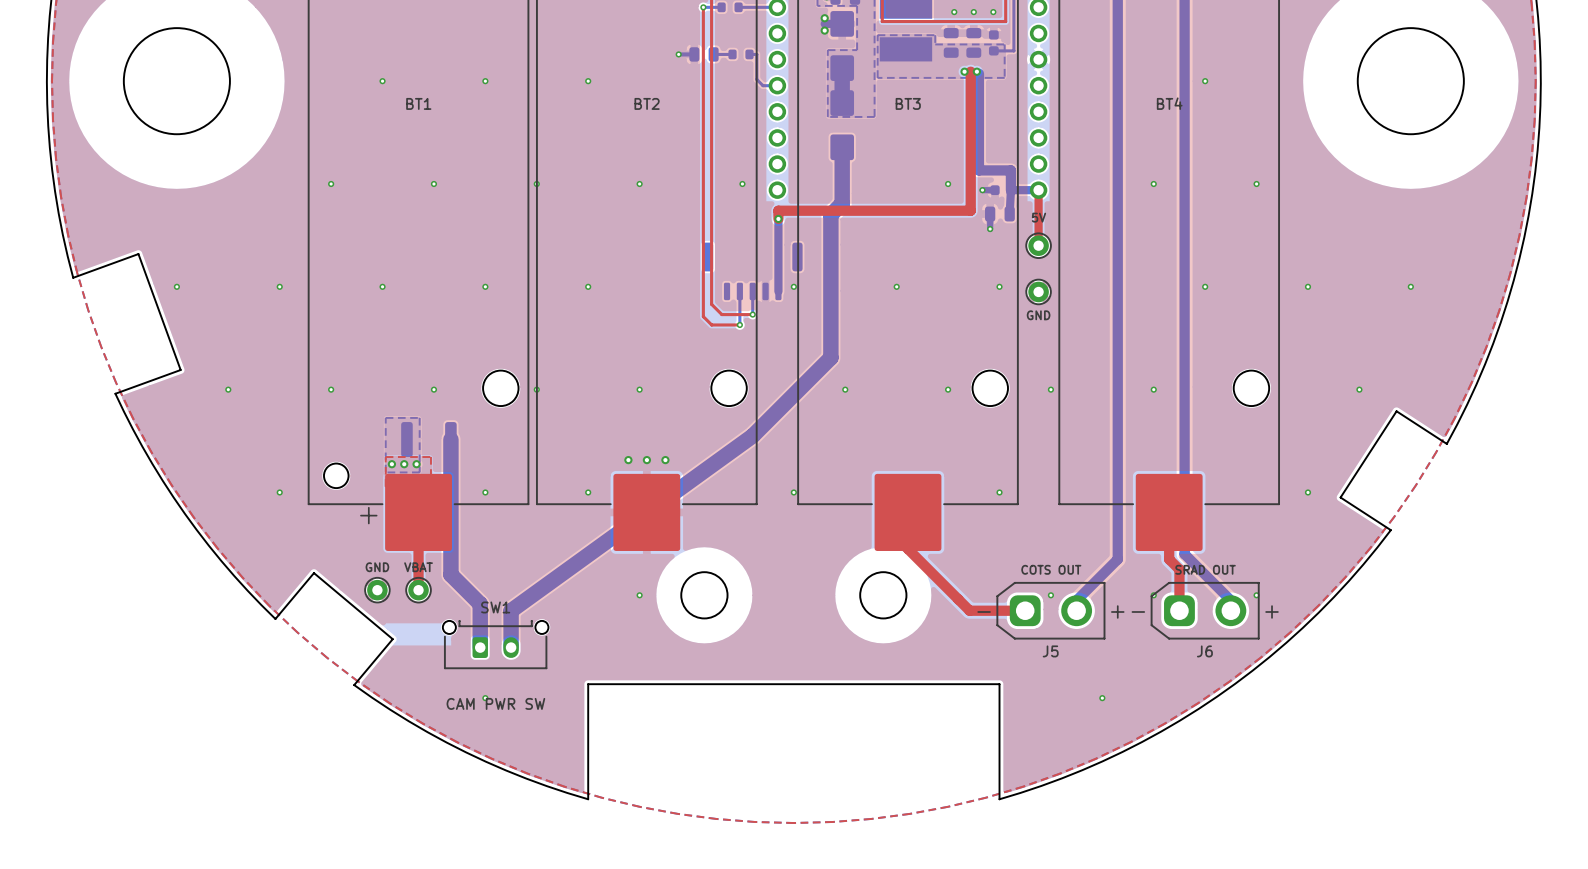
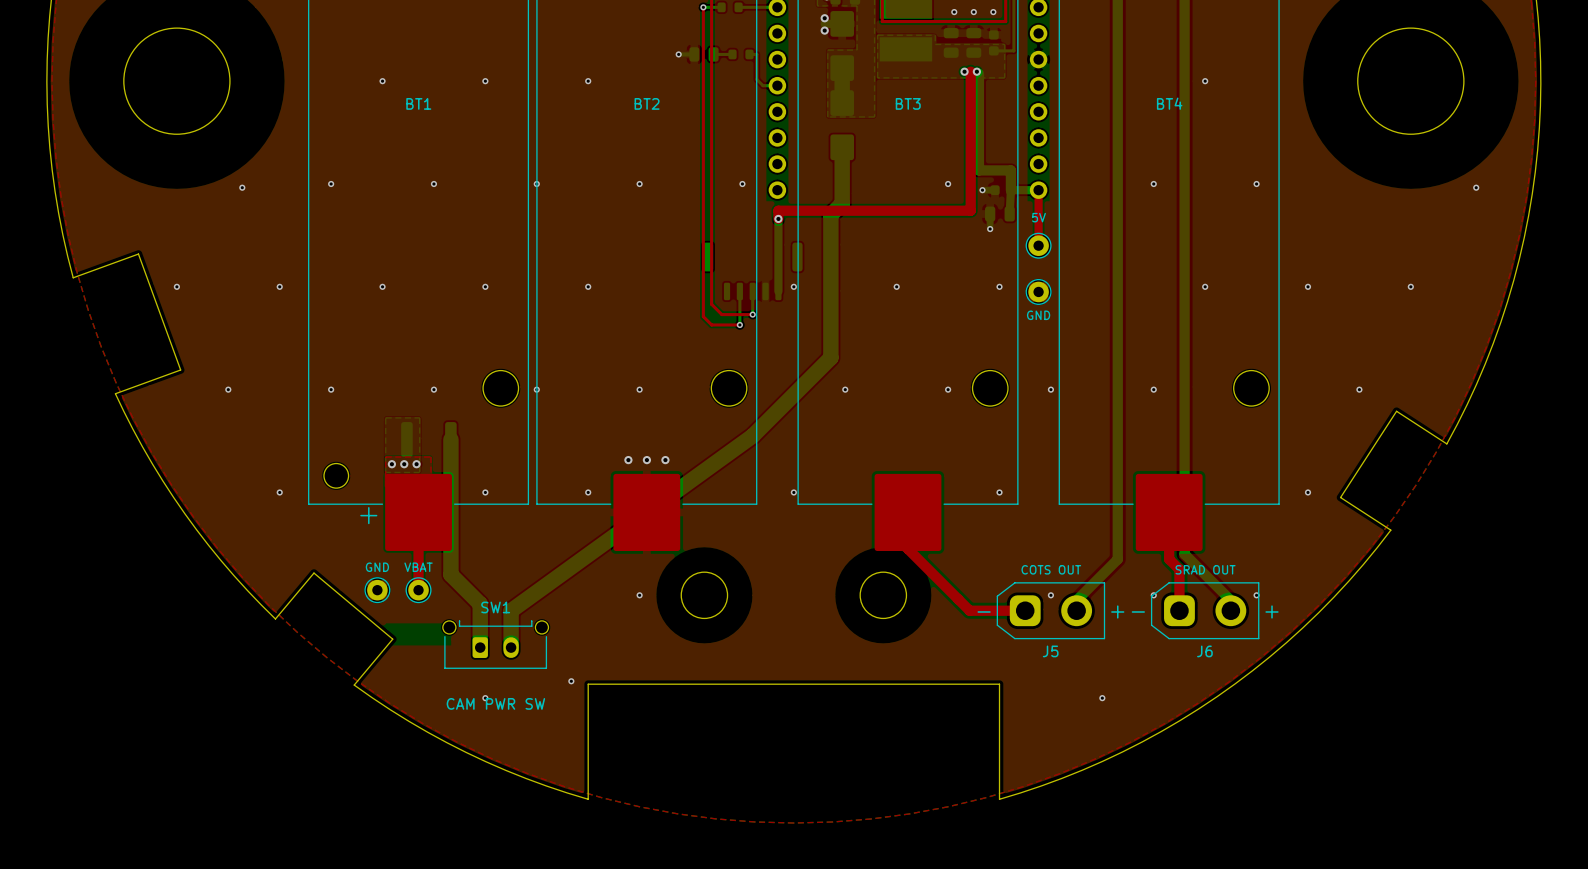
via: none -> (242, 187)
via: none -> (1476, 187)
via: none -> (571, 681)

